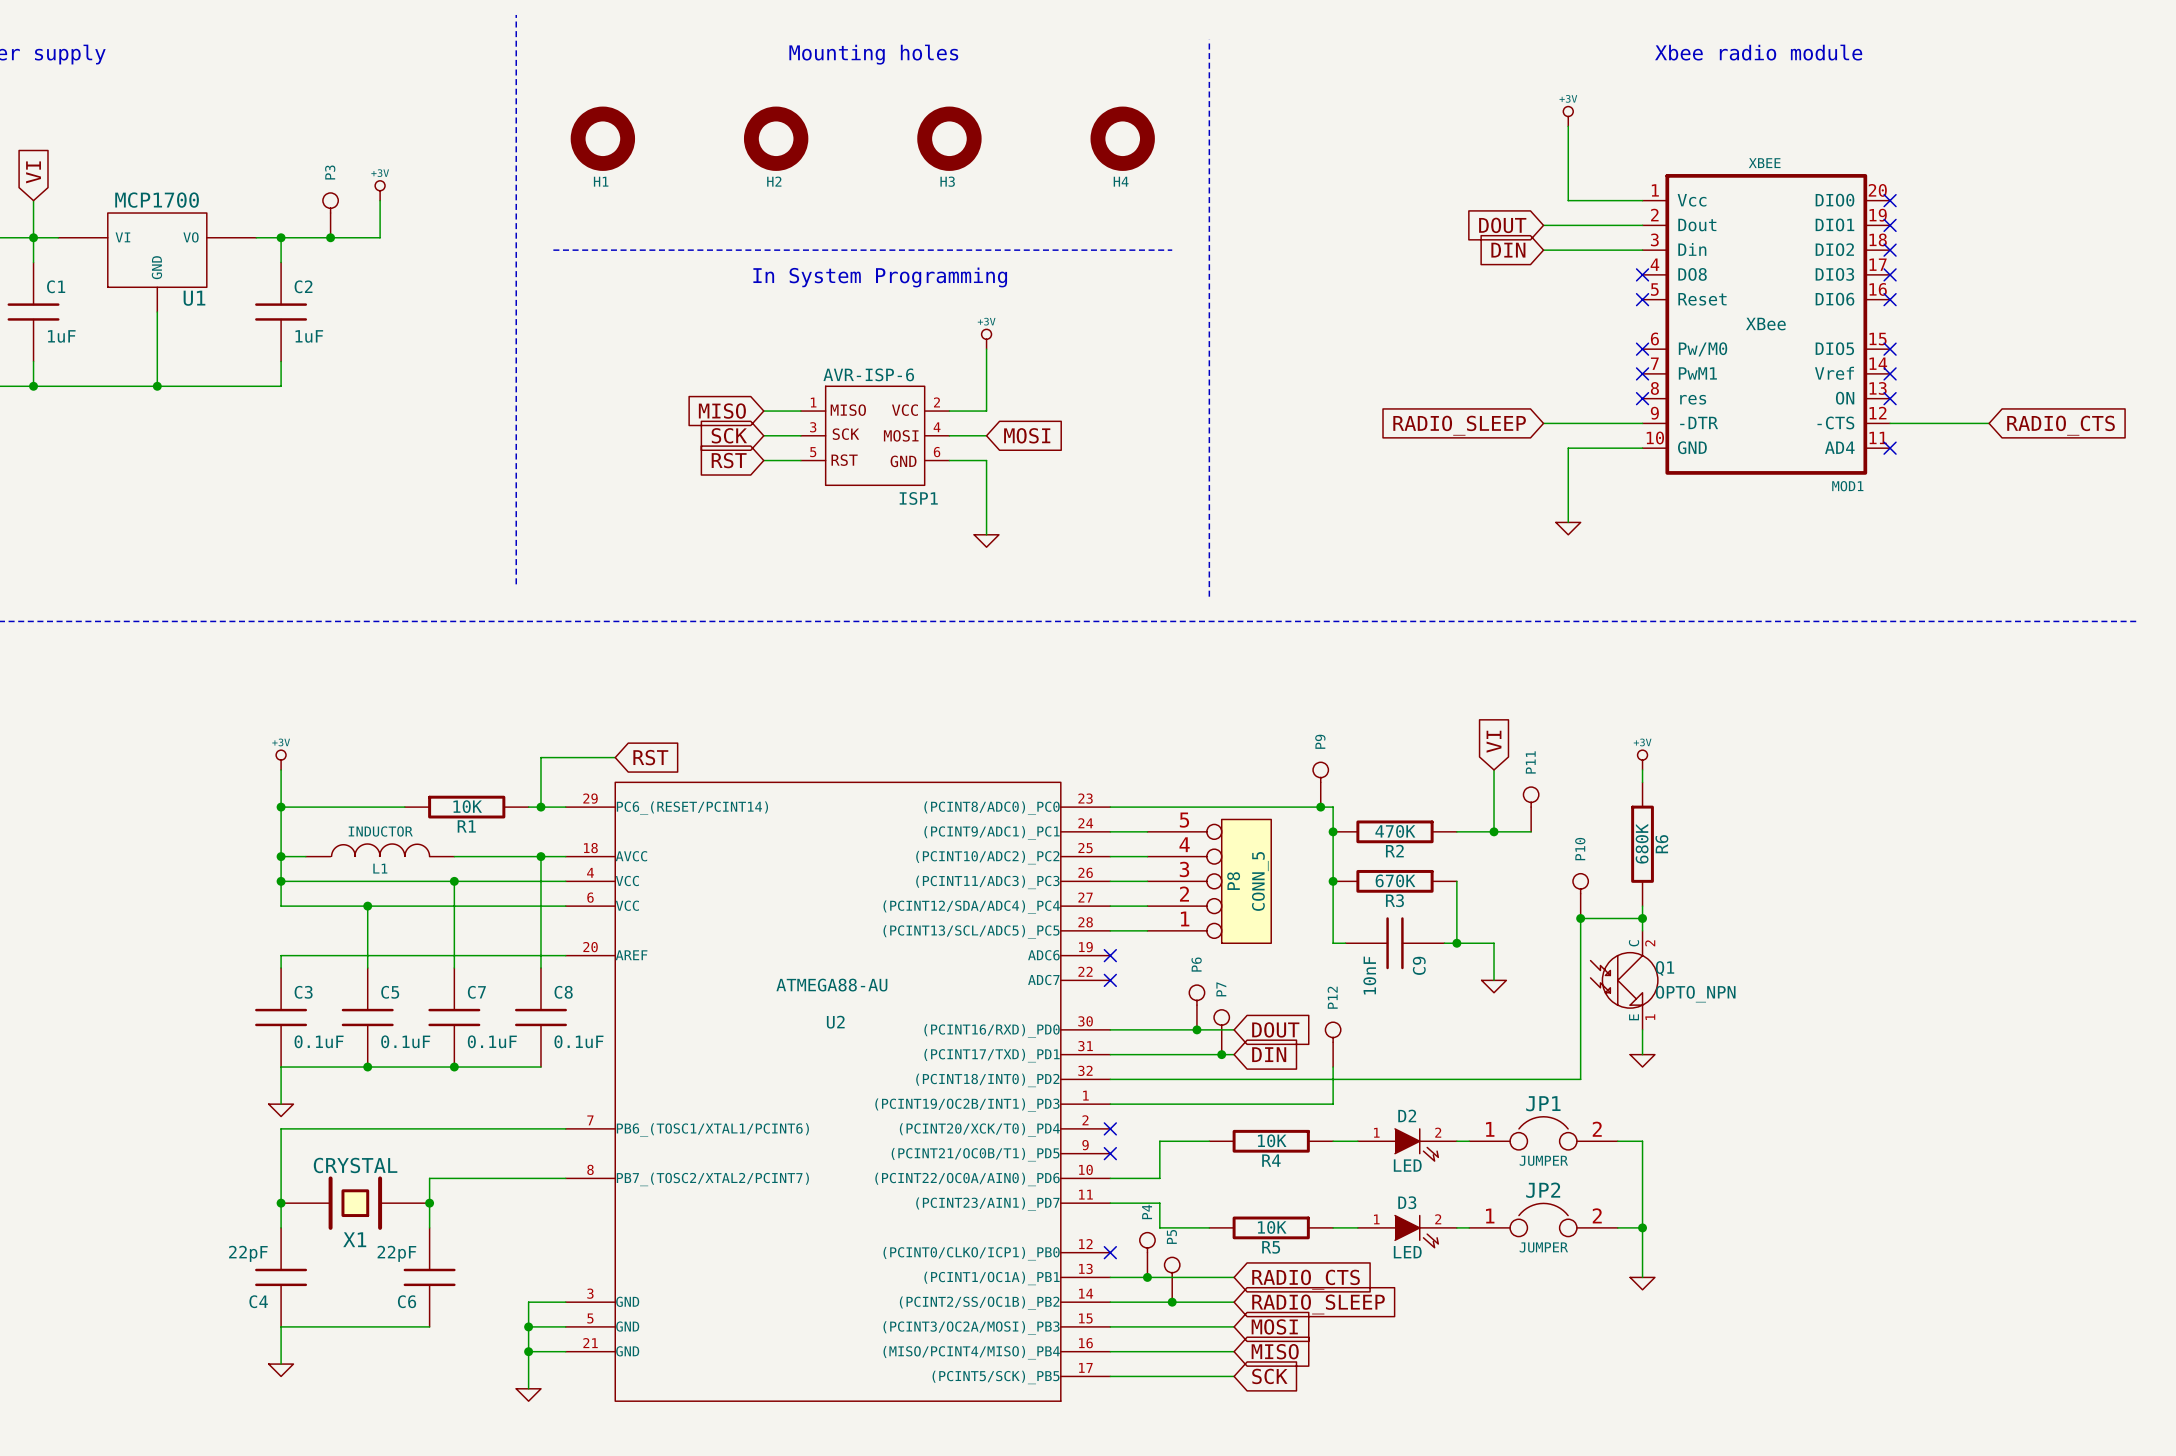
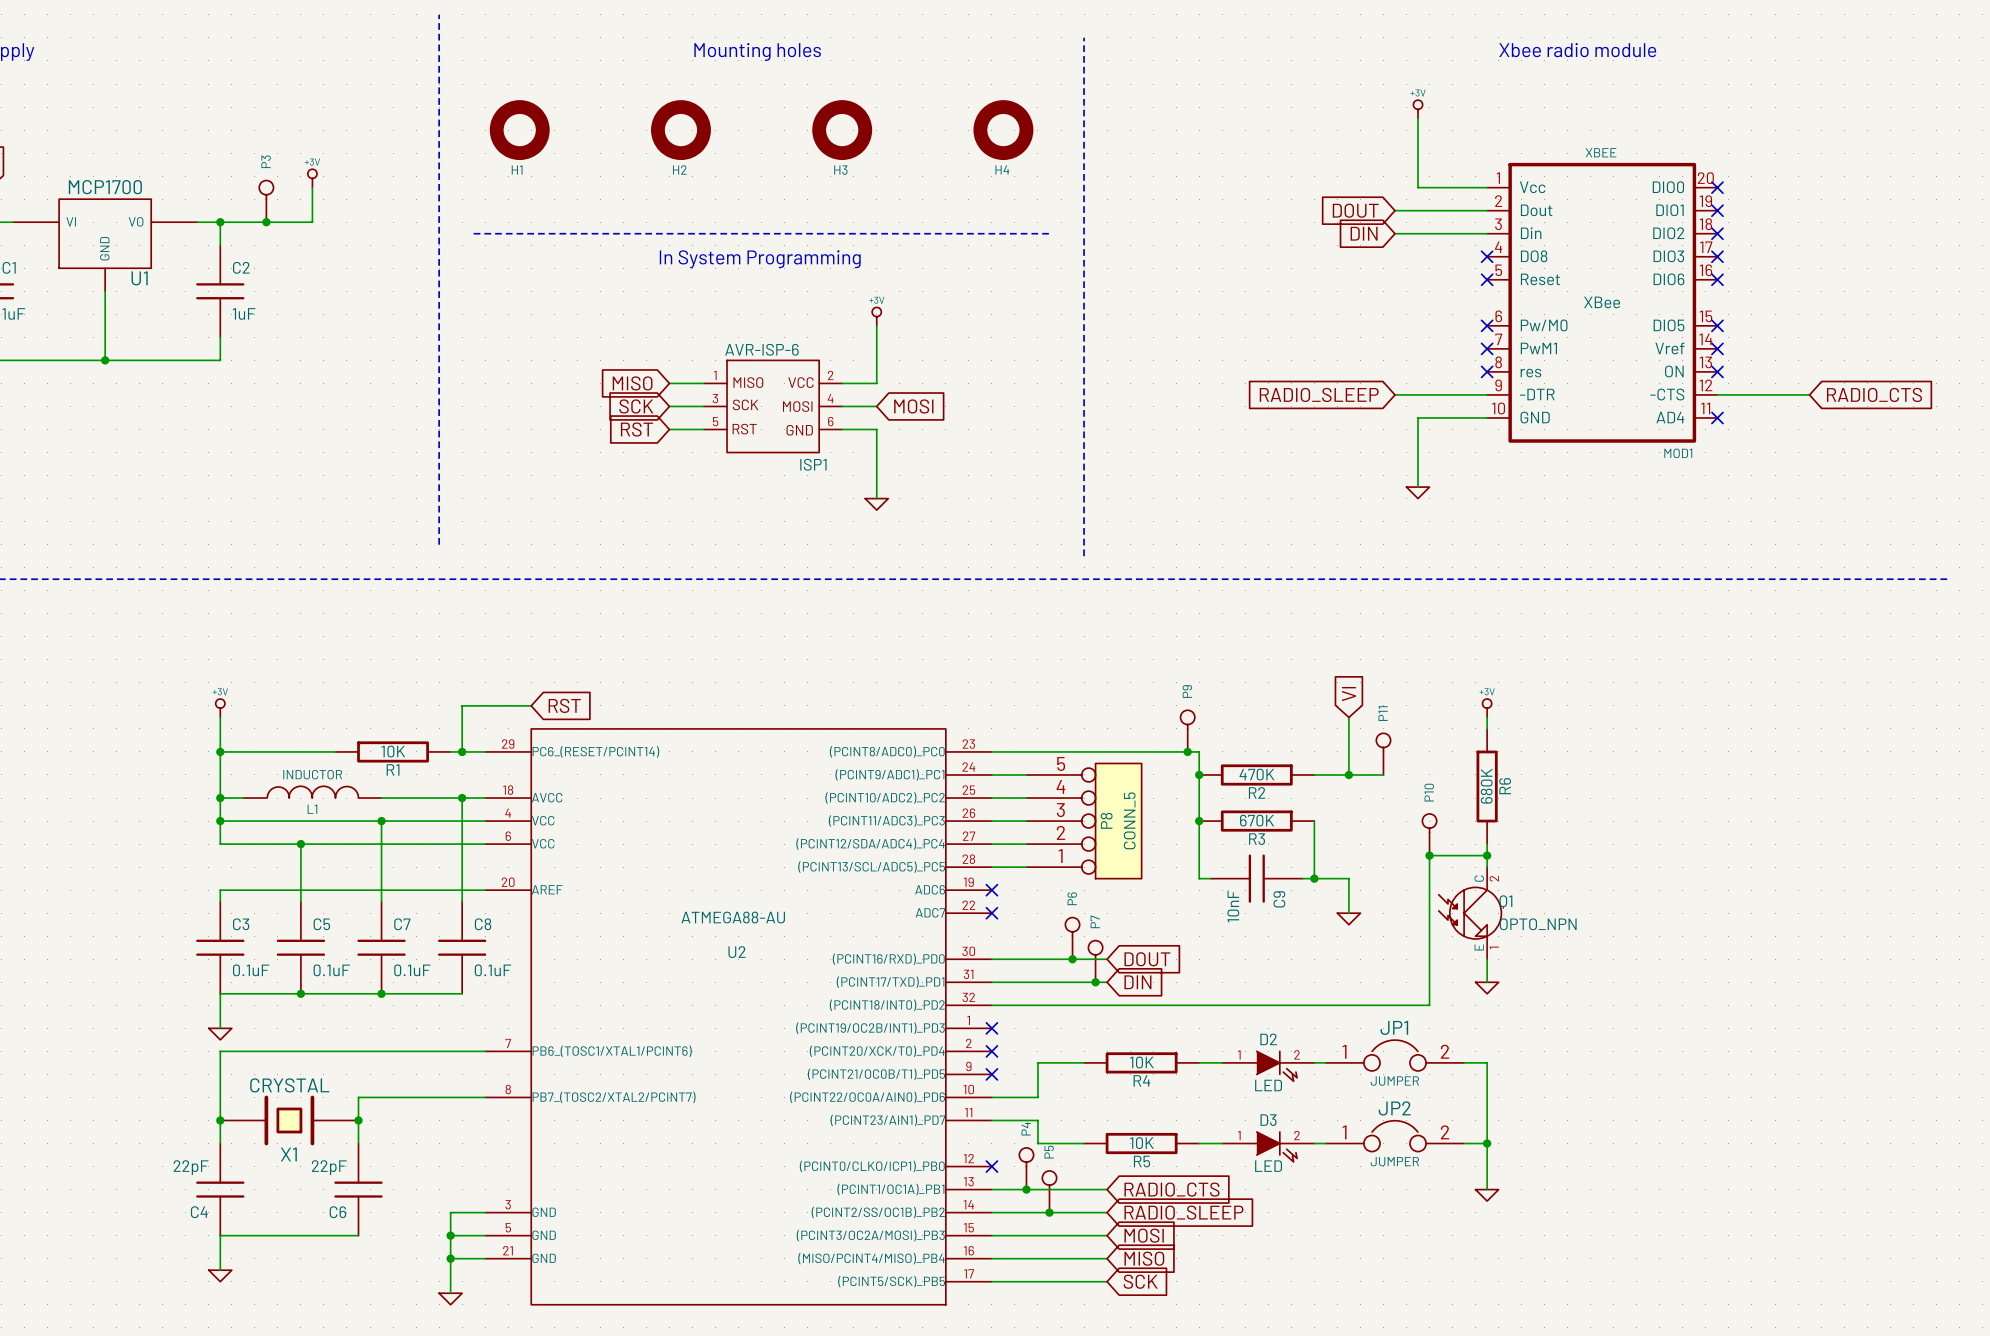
P12: (1333, 1044) -> none
wire: (1333, 1067) (1333, 1104) (1110, 1104) -> none
no-connect mark: none -> (991, 1028)

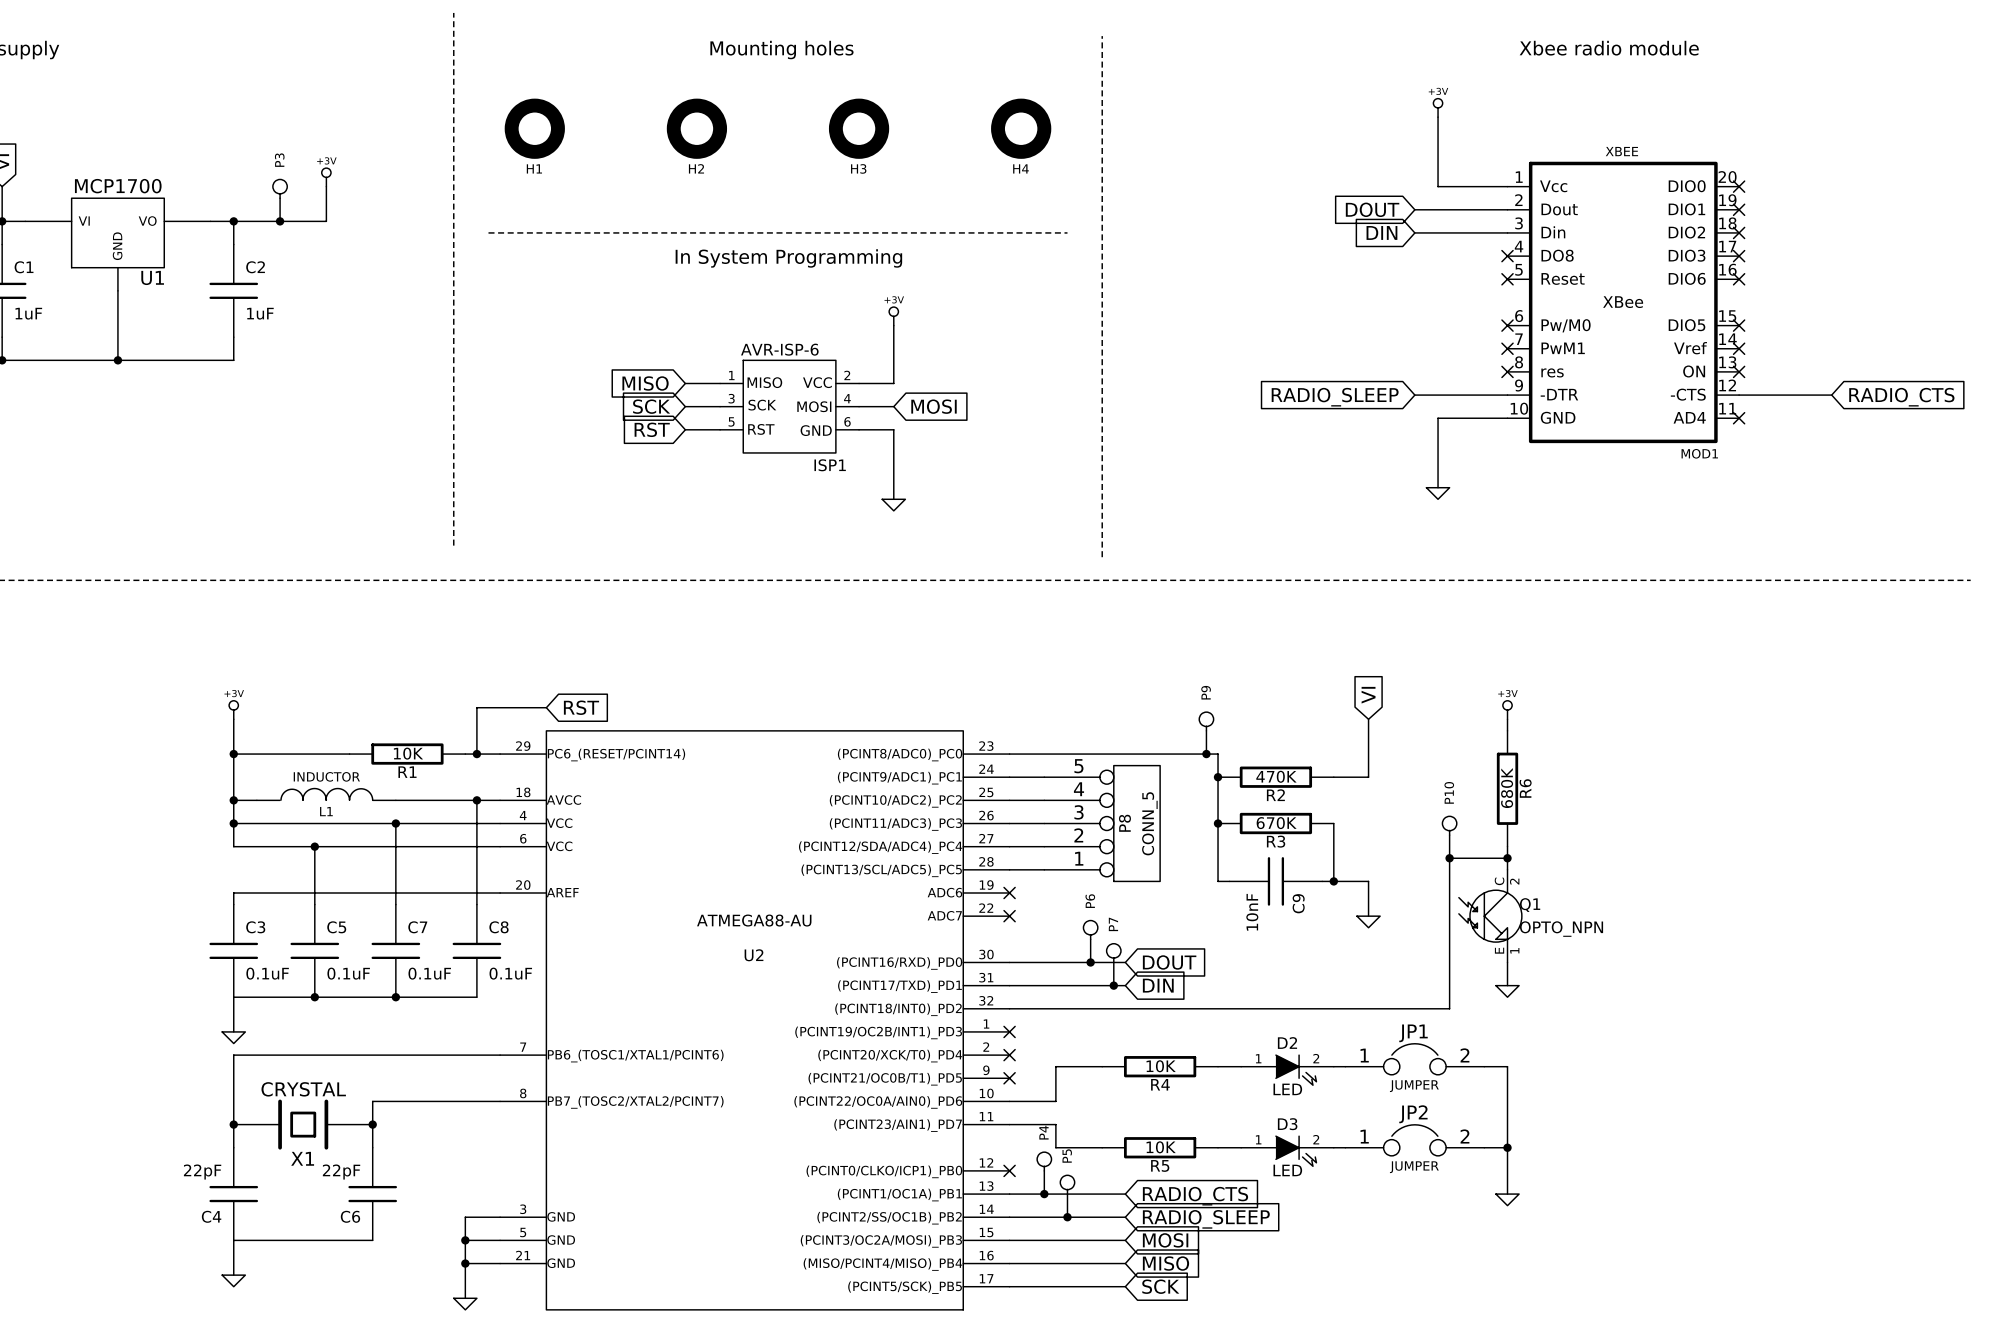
P11: (1383, 754) -> none
wire: (1348, 774) (1383, 774) -> none
junction: (1348, 774) -> none

